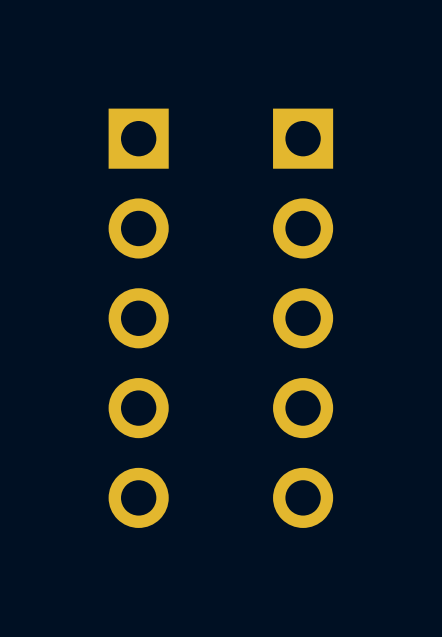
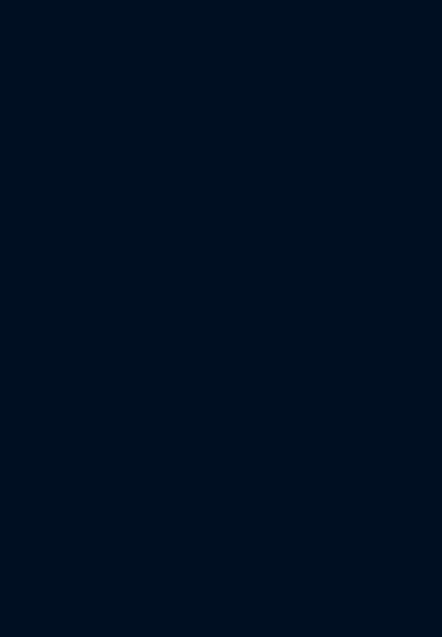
part: (138, 318) -> none
part: (303, 318) -> none

